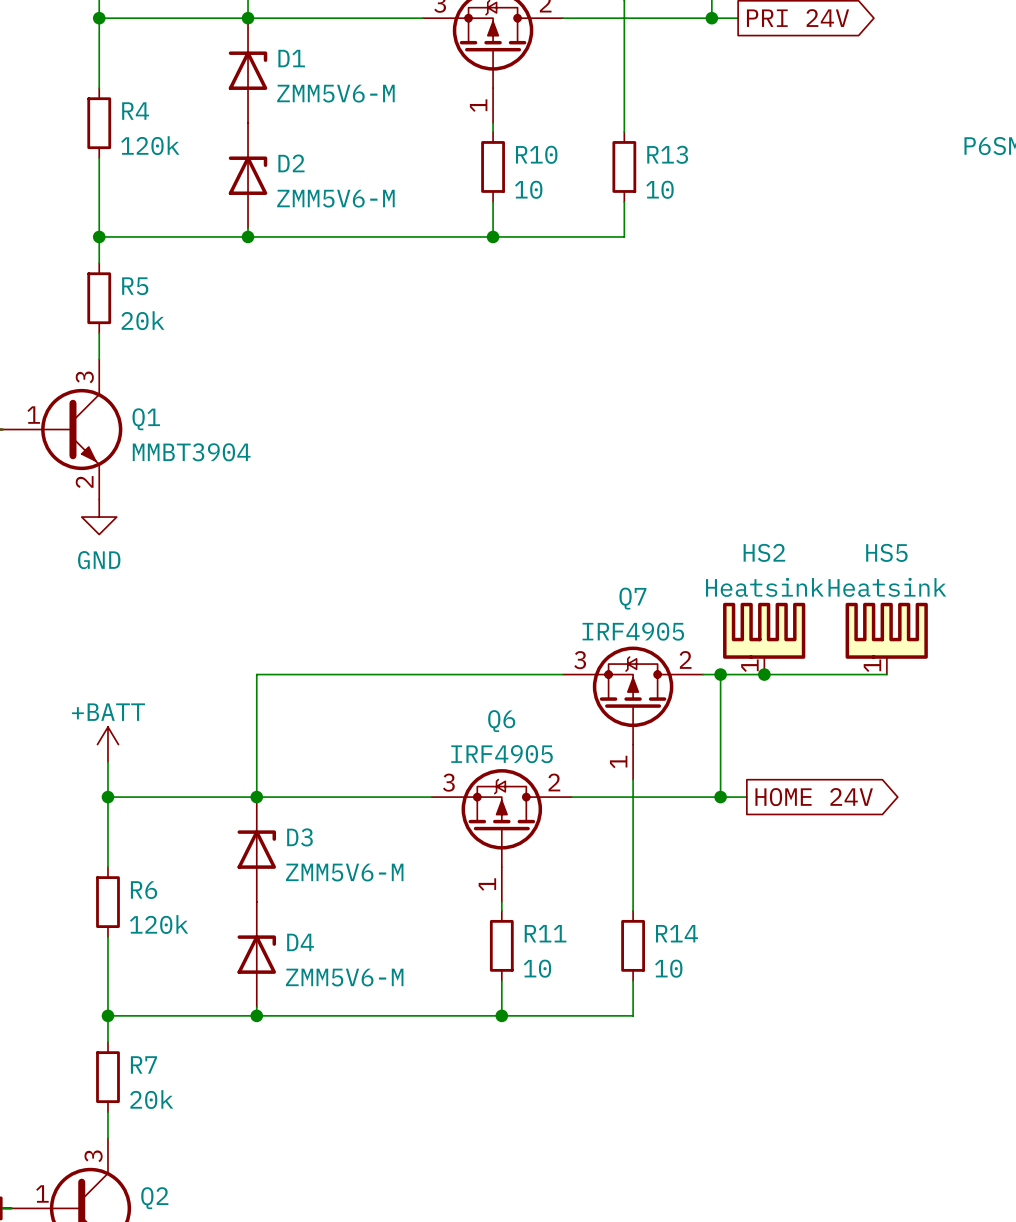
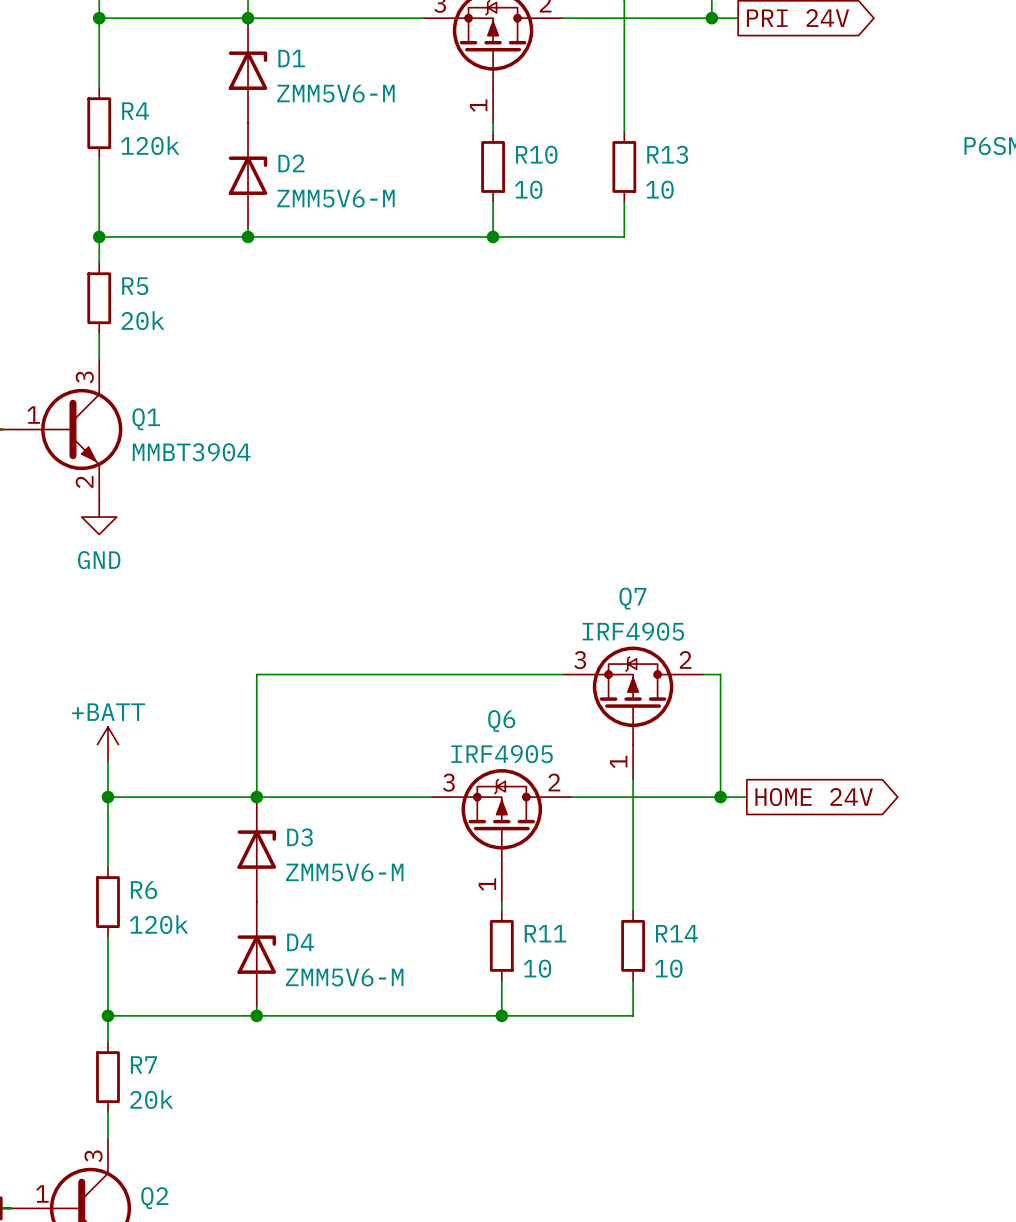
HS2: Heatsink (764, 638) -> none
HS5: Heatsink (886, 638) -> none
wire: (720, 674) (886, 674) -> none
junction: (720, 674) -> none
junction: (764, 674) -> none

